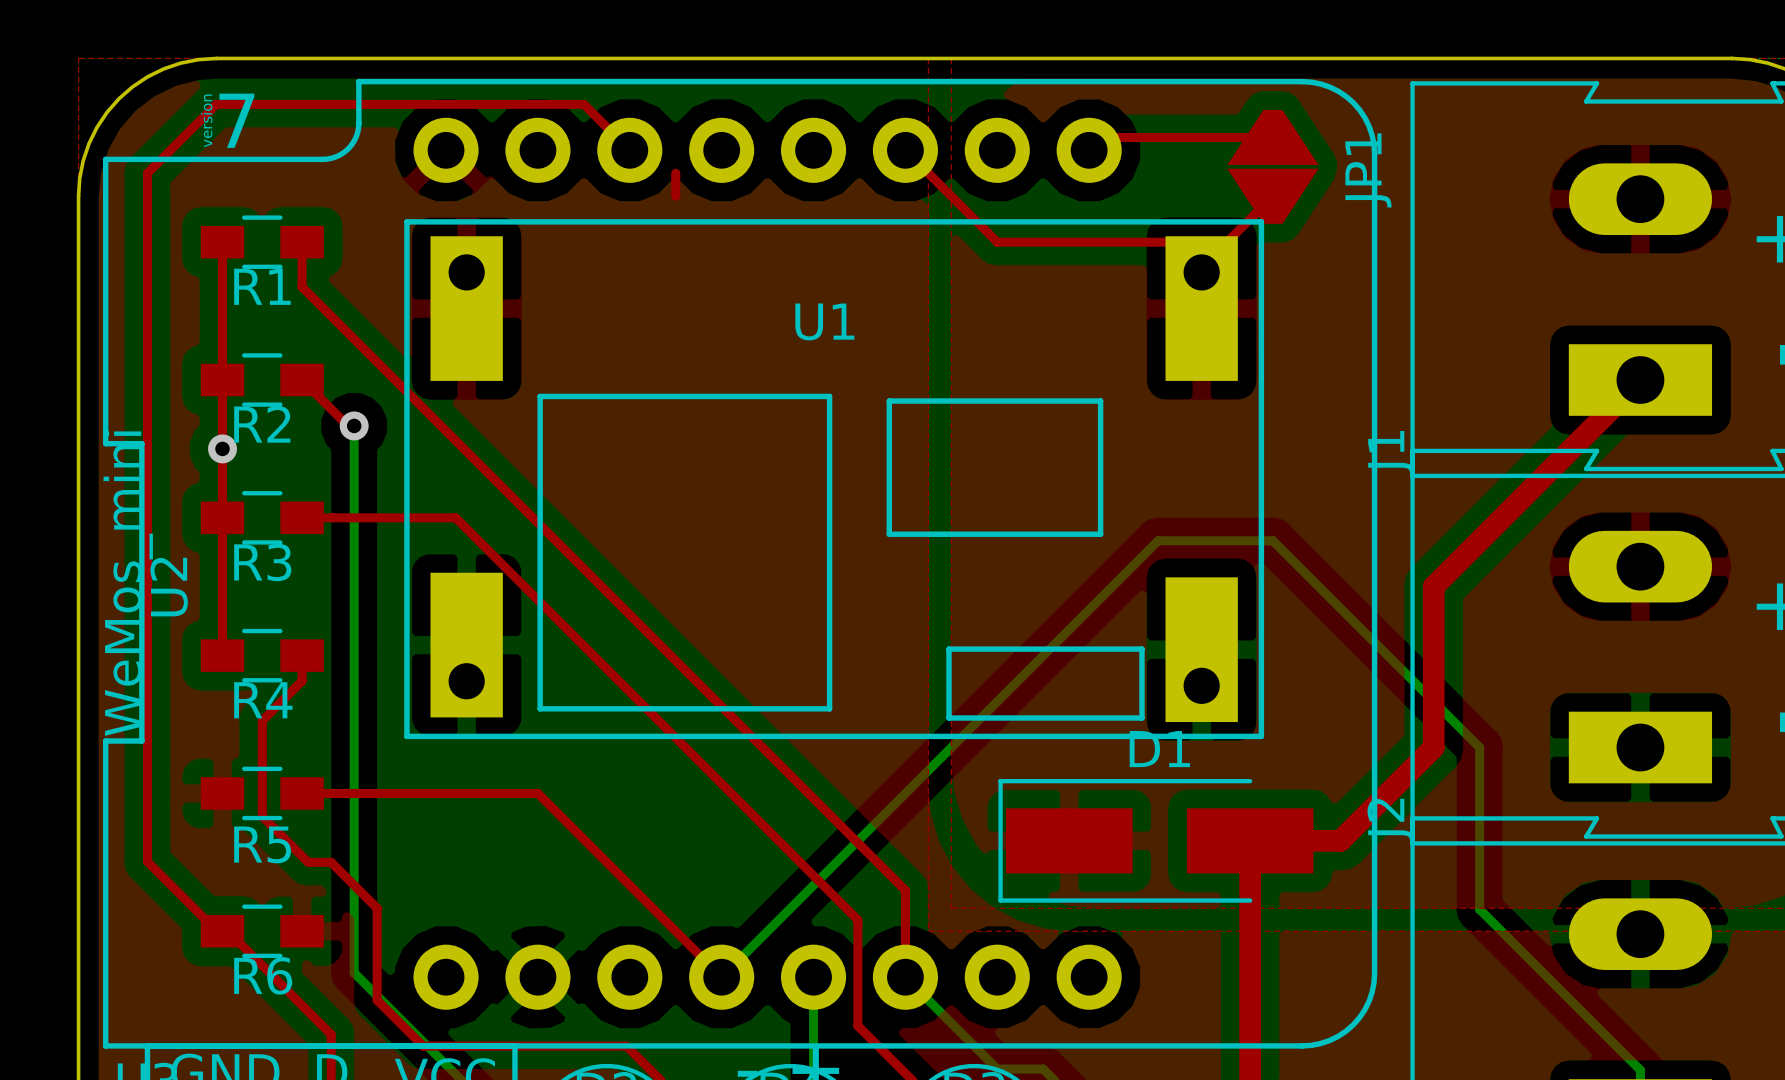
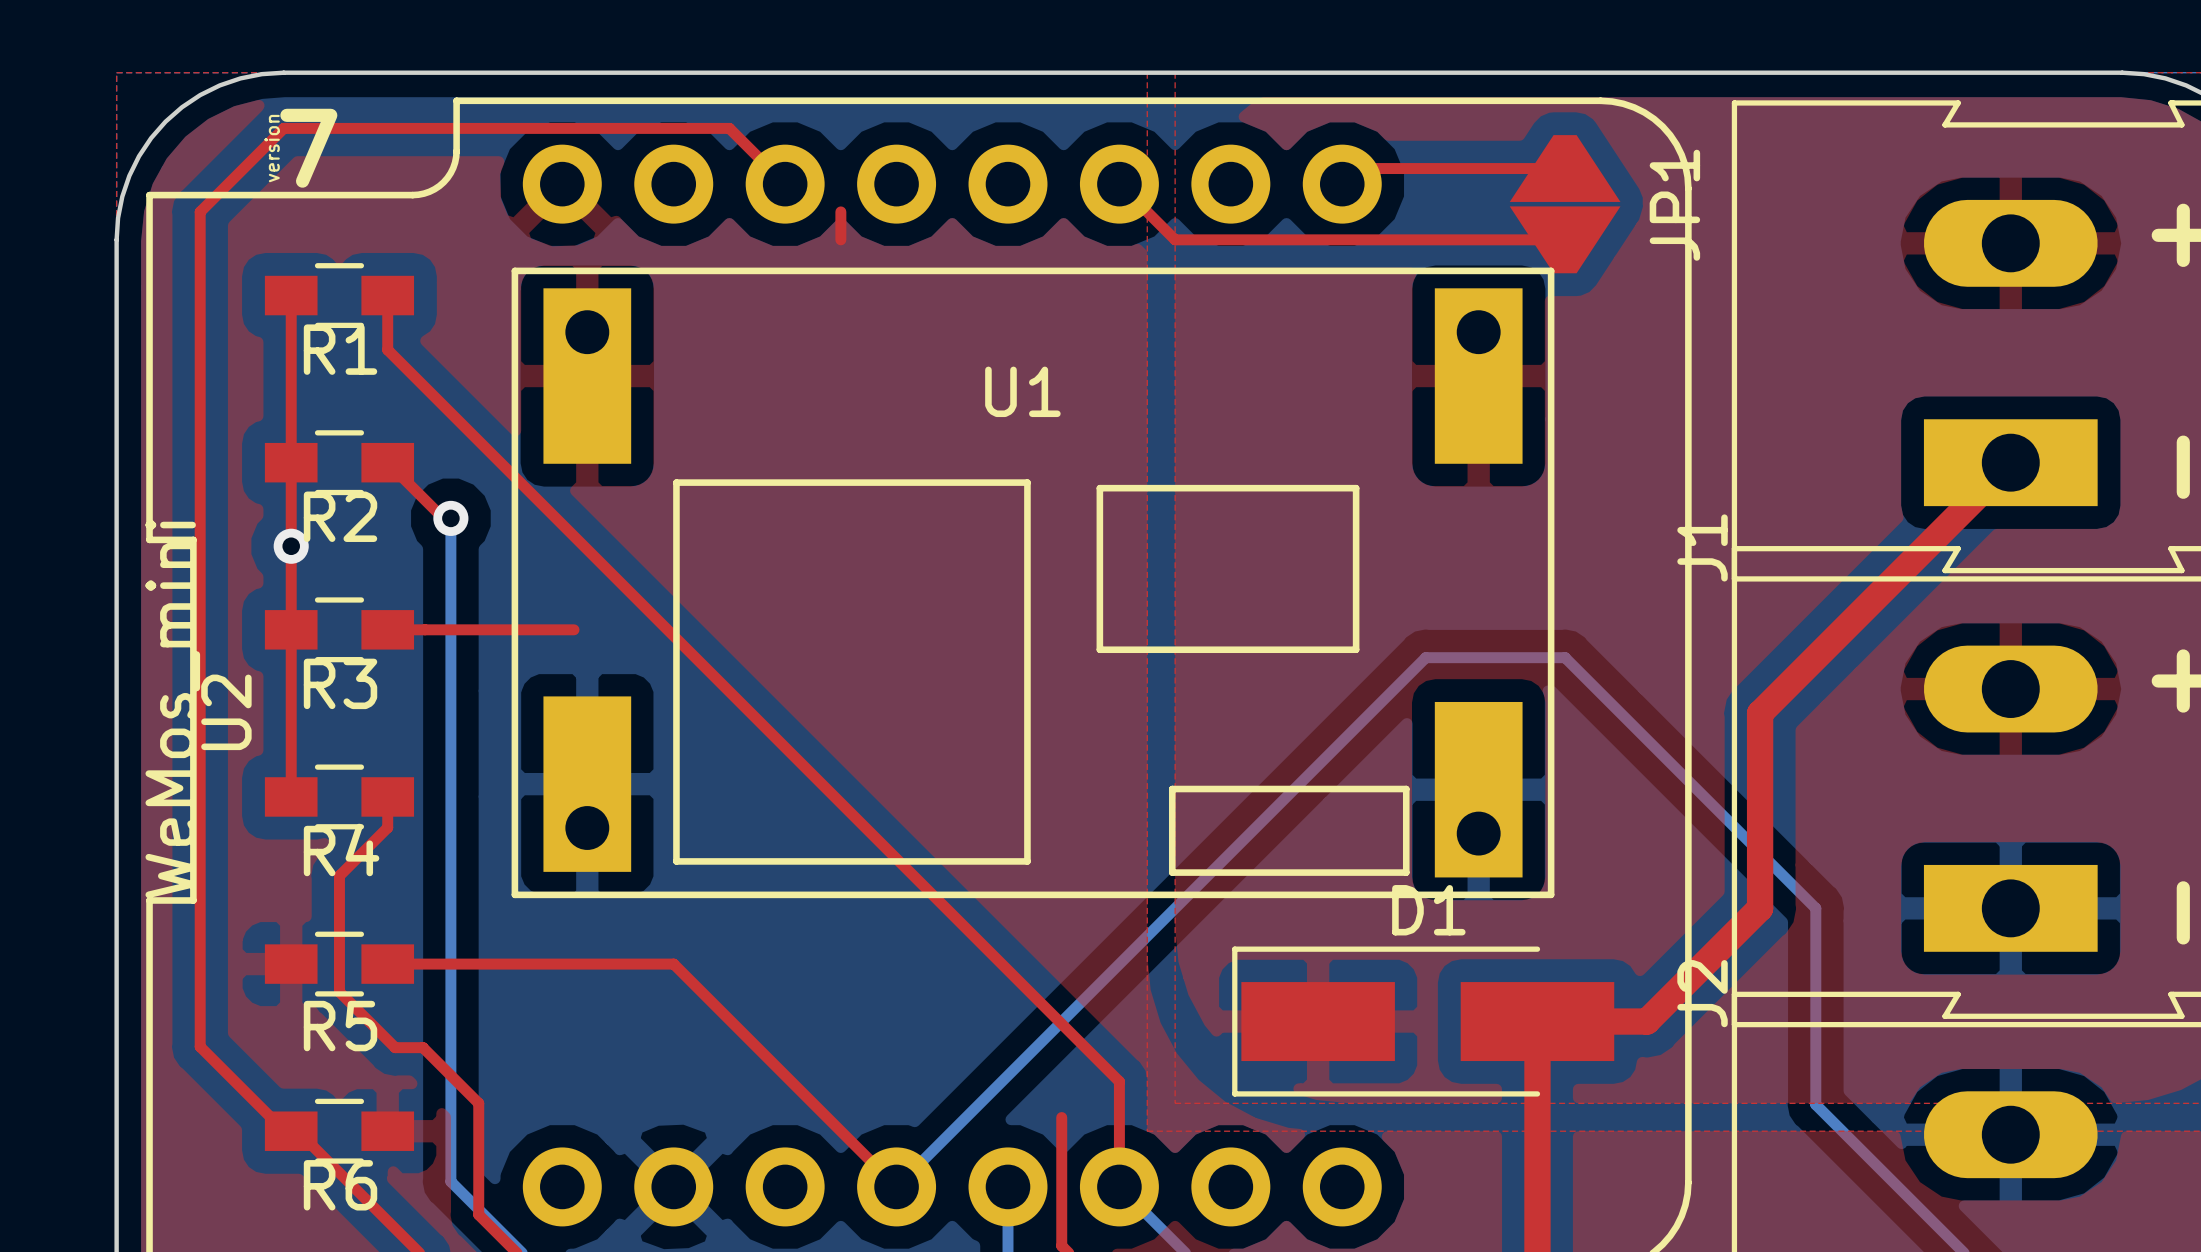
top track: (951, 196) (997, 242) (1226, 242) (1272, 196) -> (1175, 239) (1565, 239)
top track: (455, 517) (857, 919) -> none

